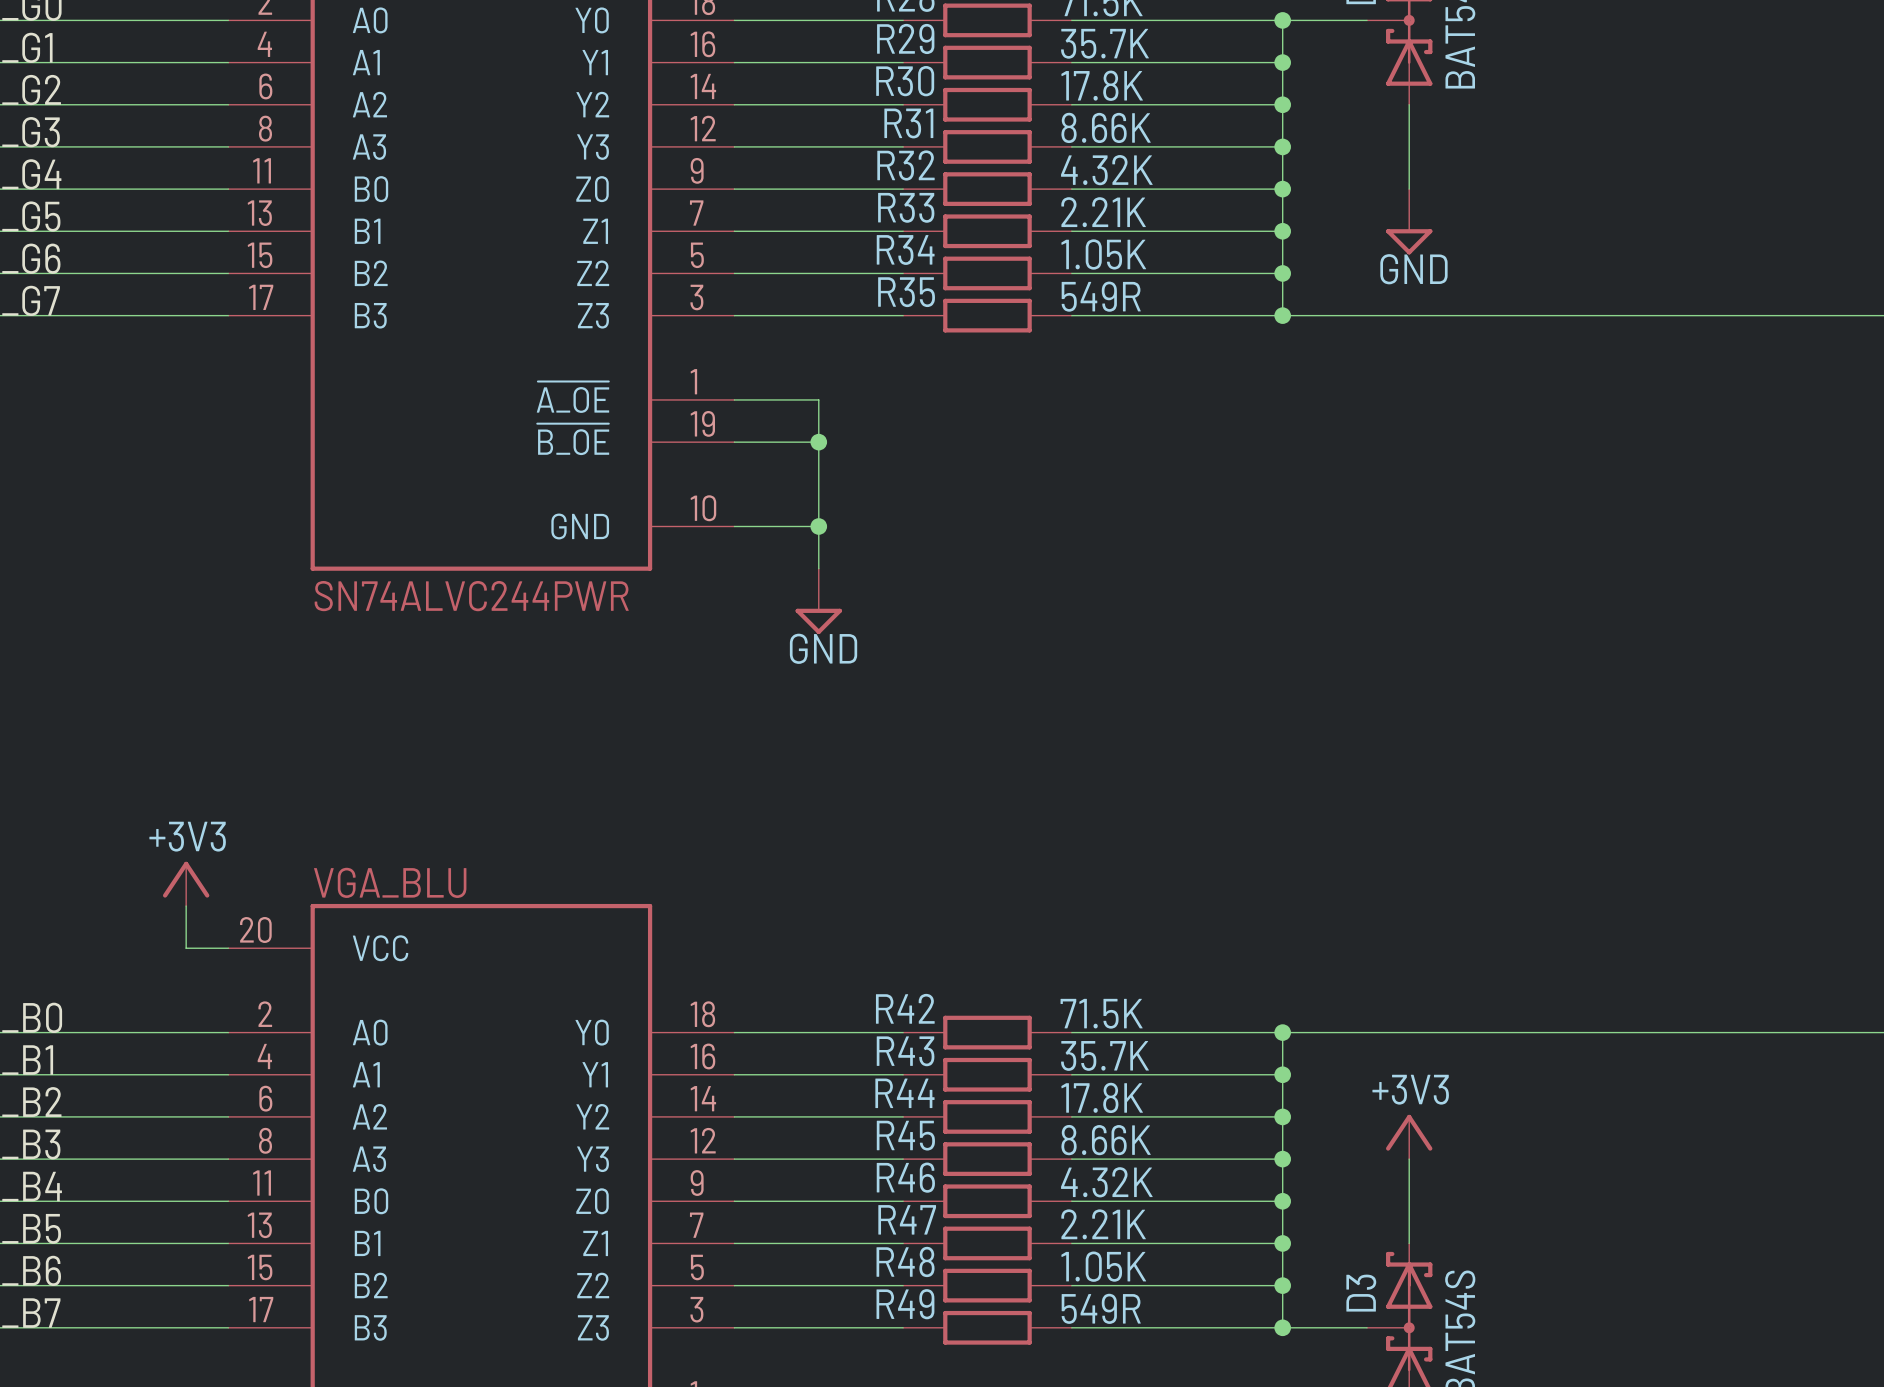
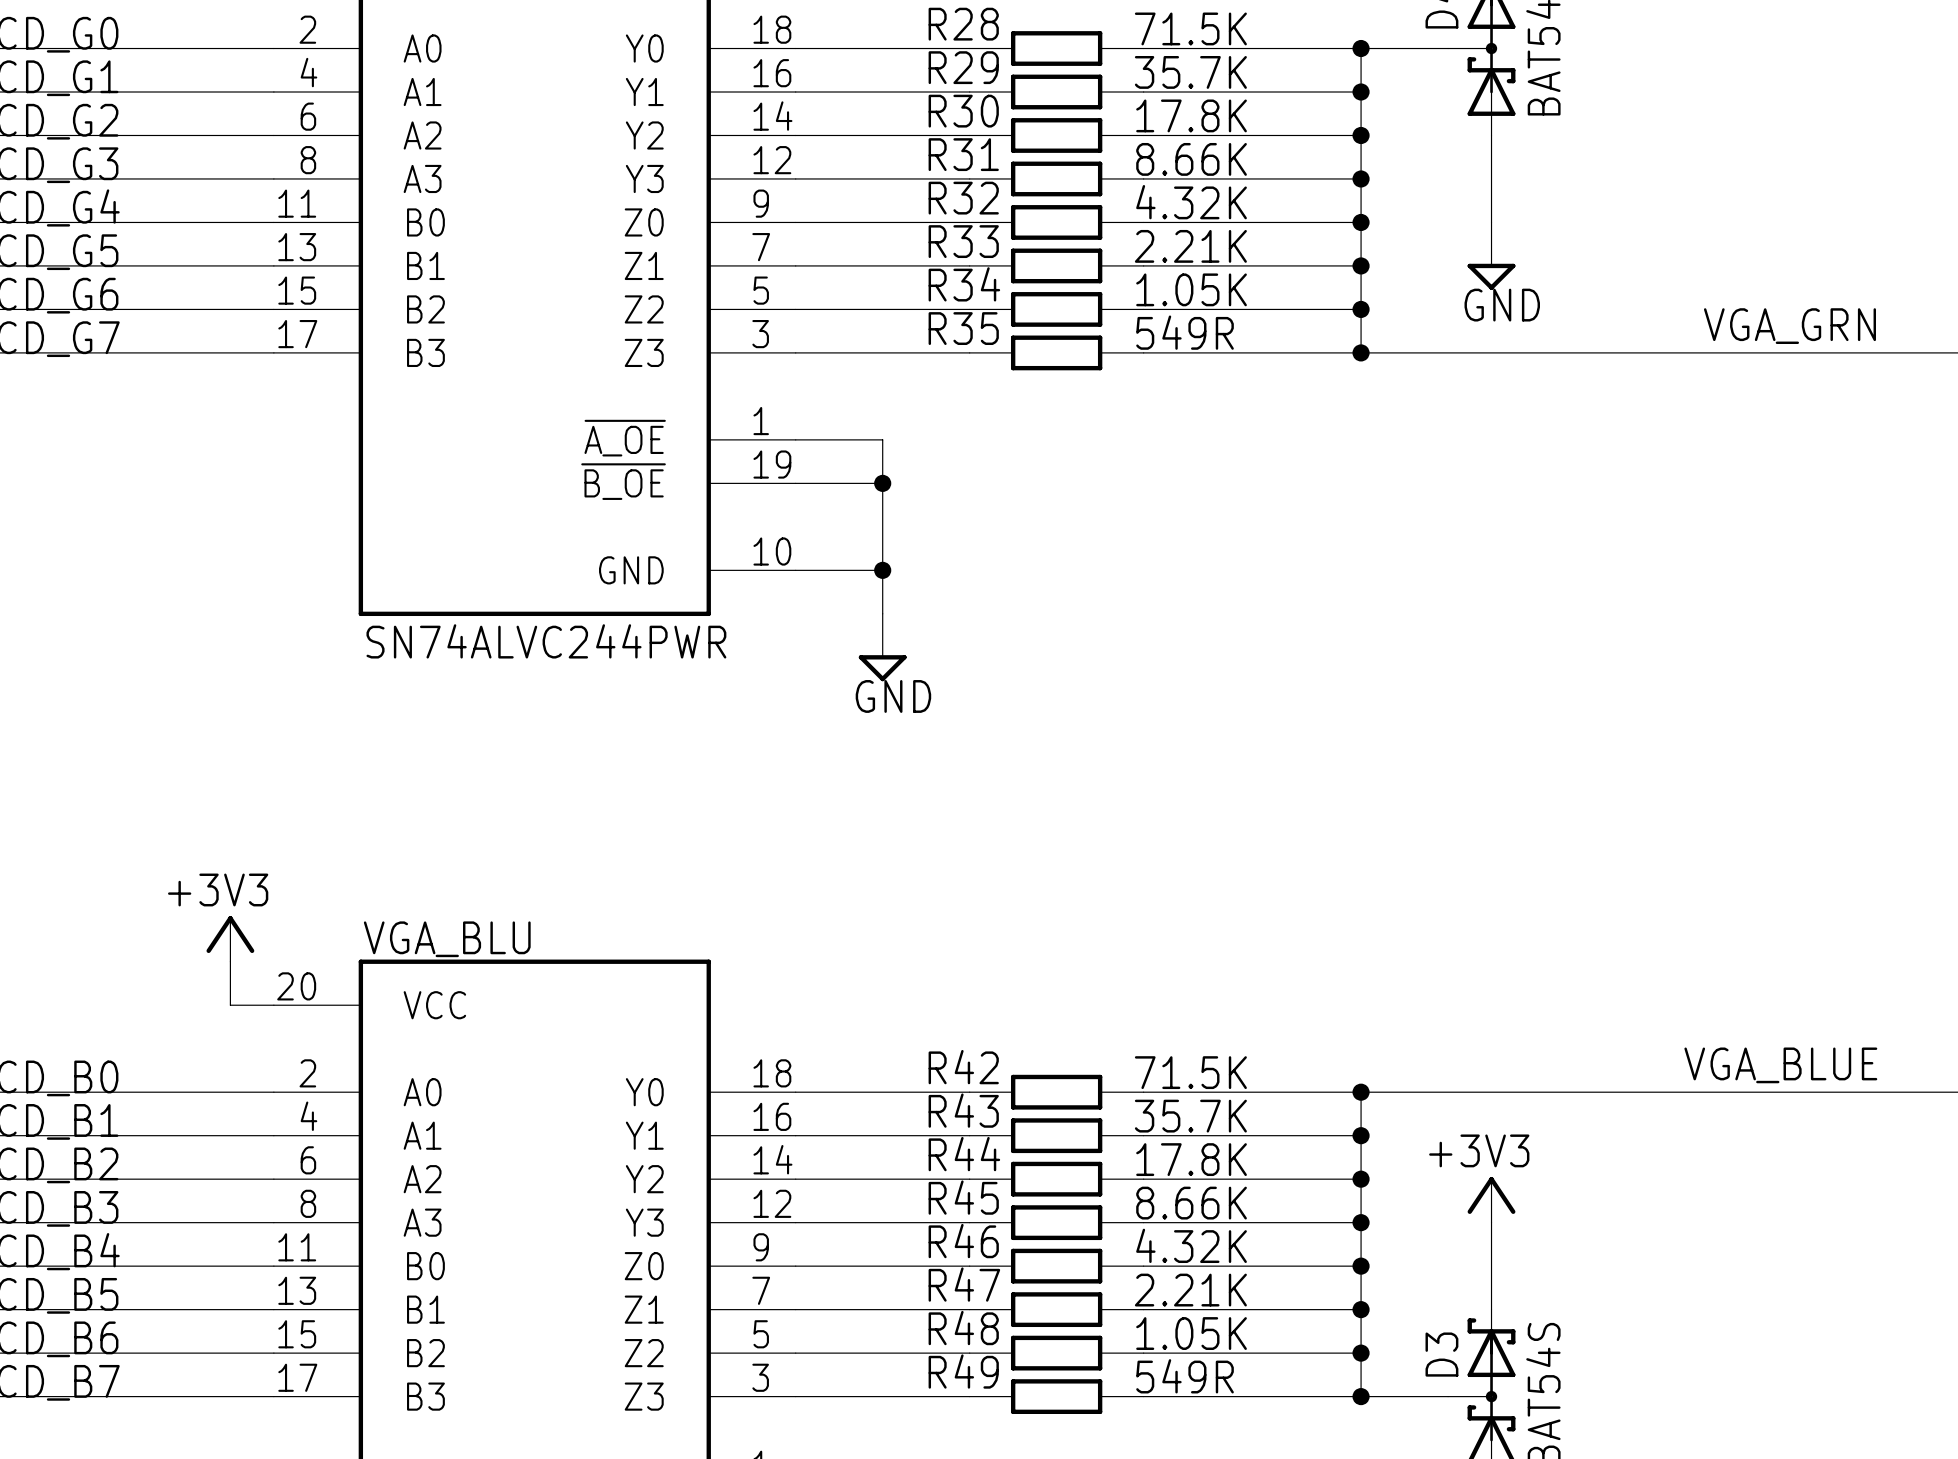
label: none -> VGA_GRN (1789, 326)
label: none -> VGA_BLUE (1780, 1065)

